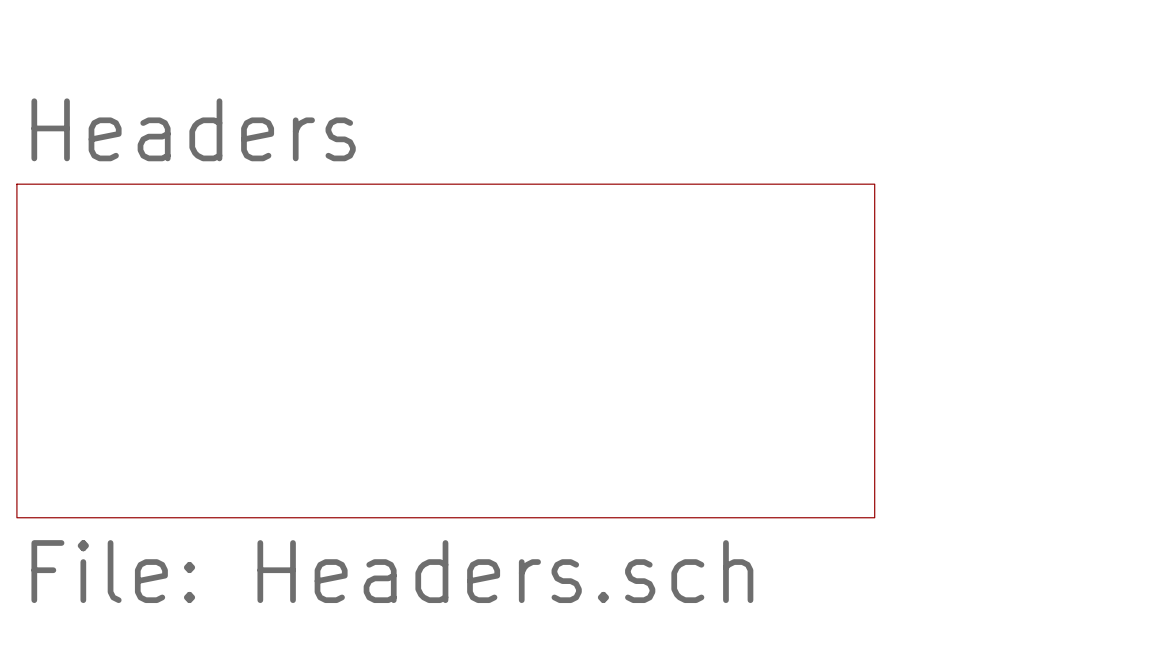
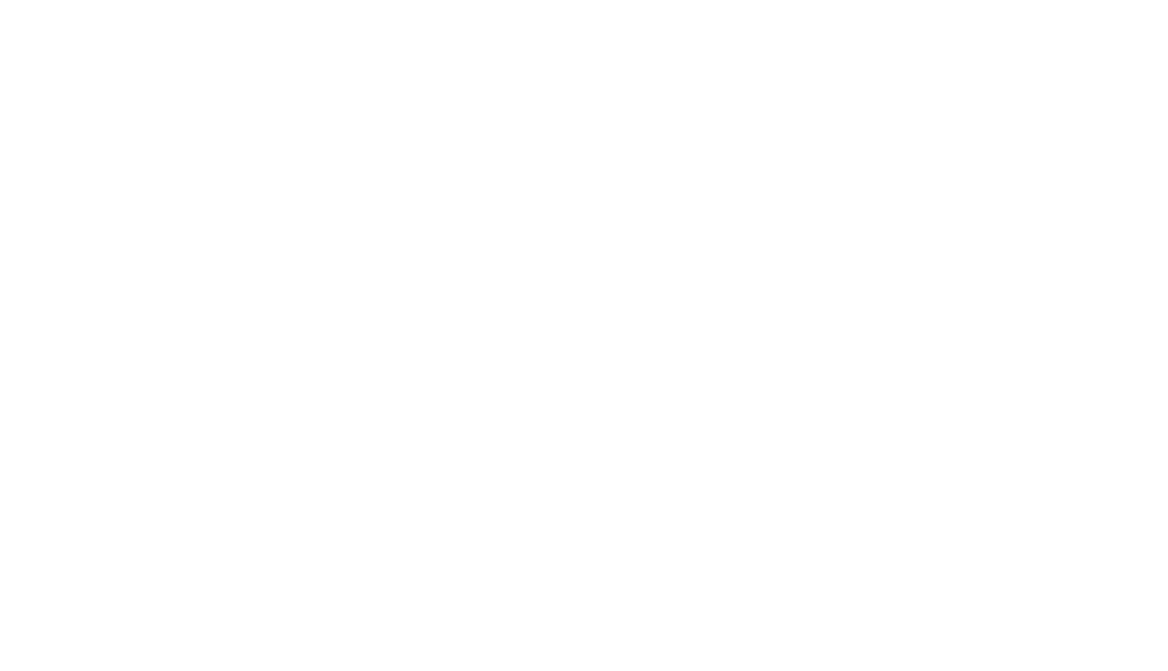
sheet Headers: File: Headers.sch (445, 350) -> none

